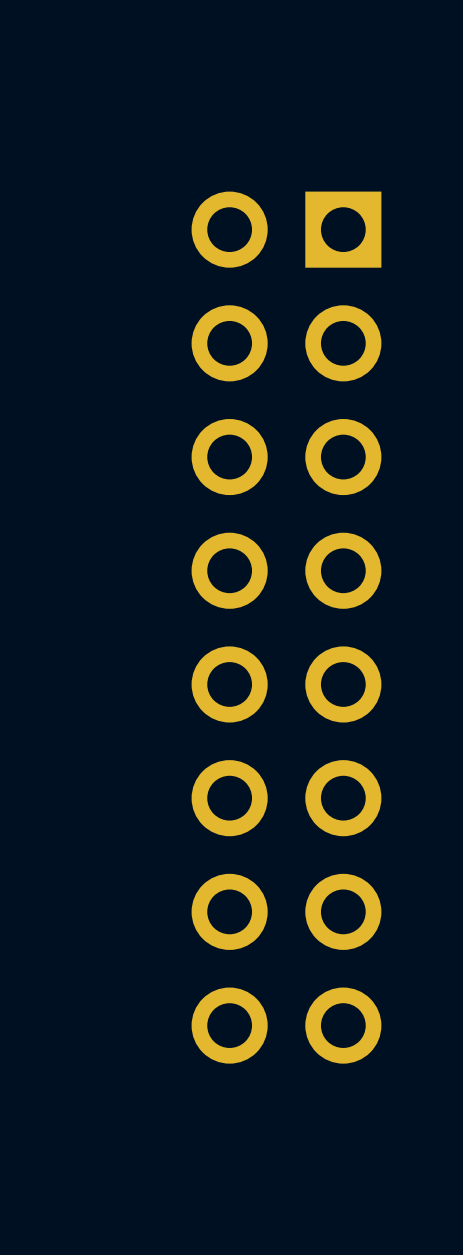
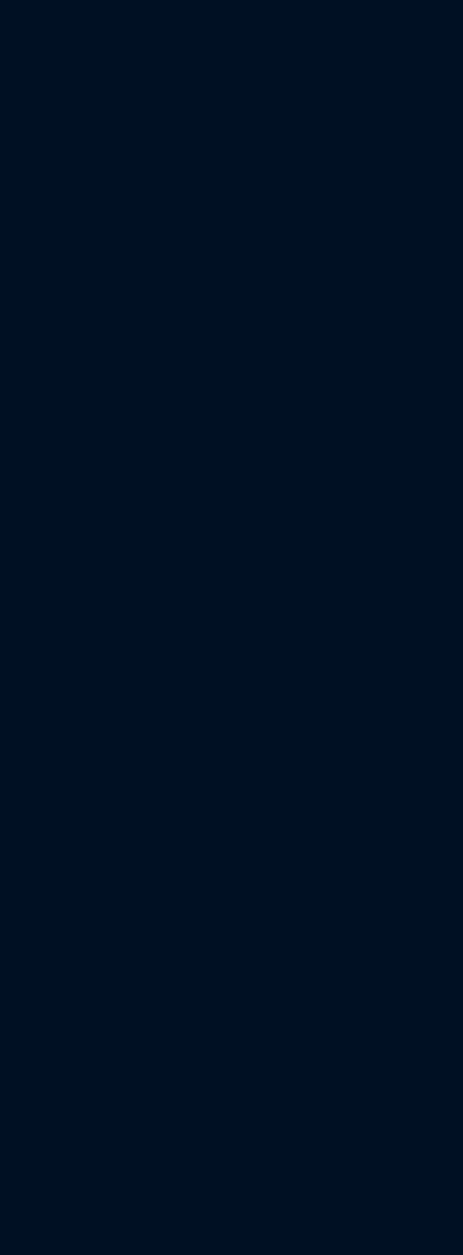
part: (286, 627) -> none

